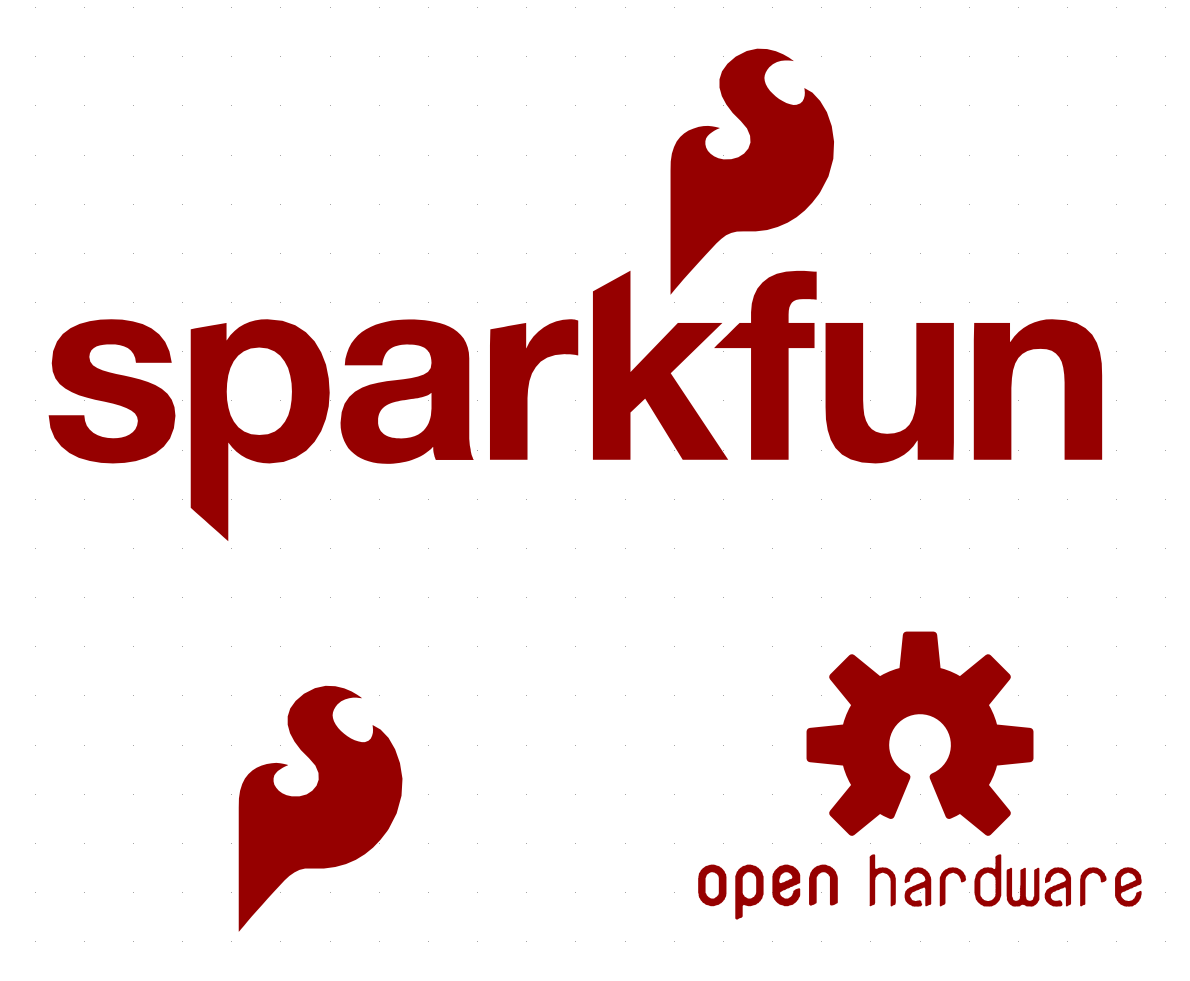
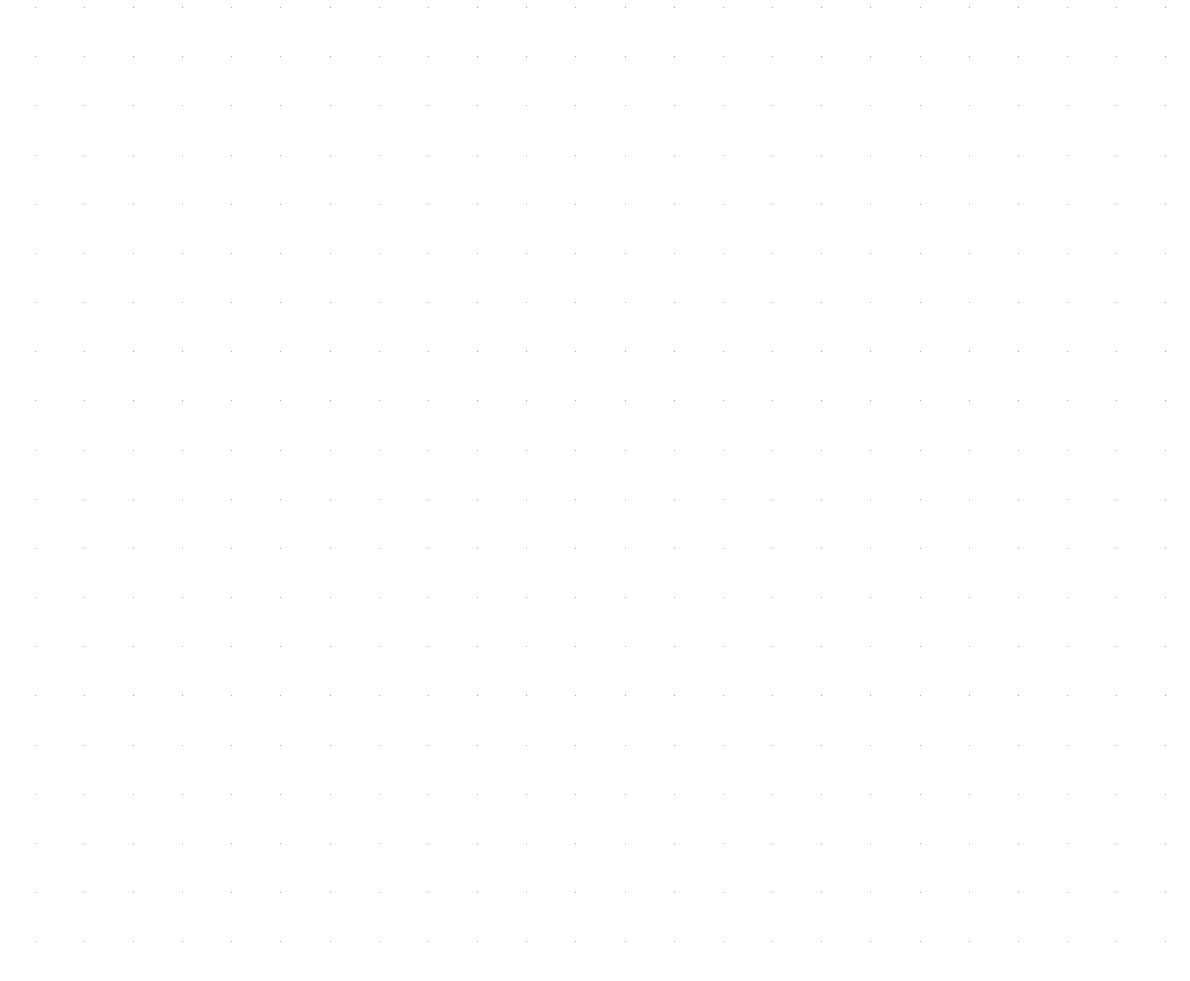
part: (575, 294) -> none
part: (919, 775) -> none
part: (320, 808) -> none

